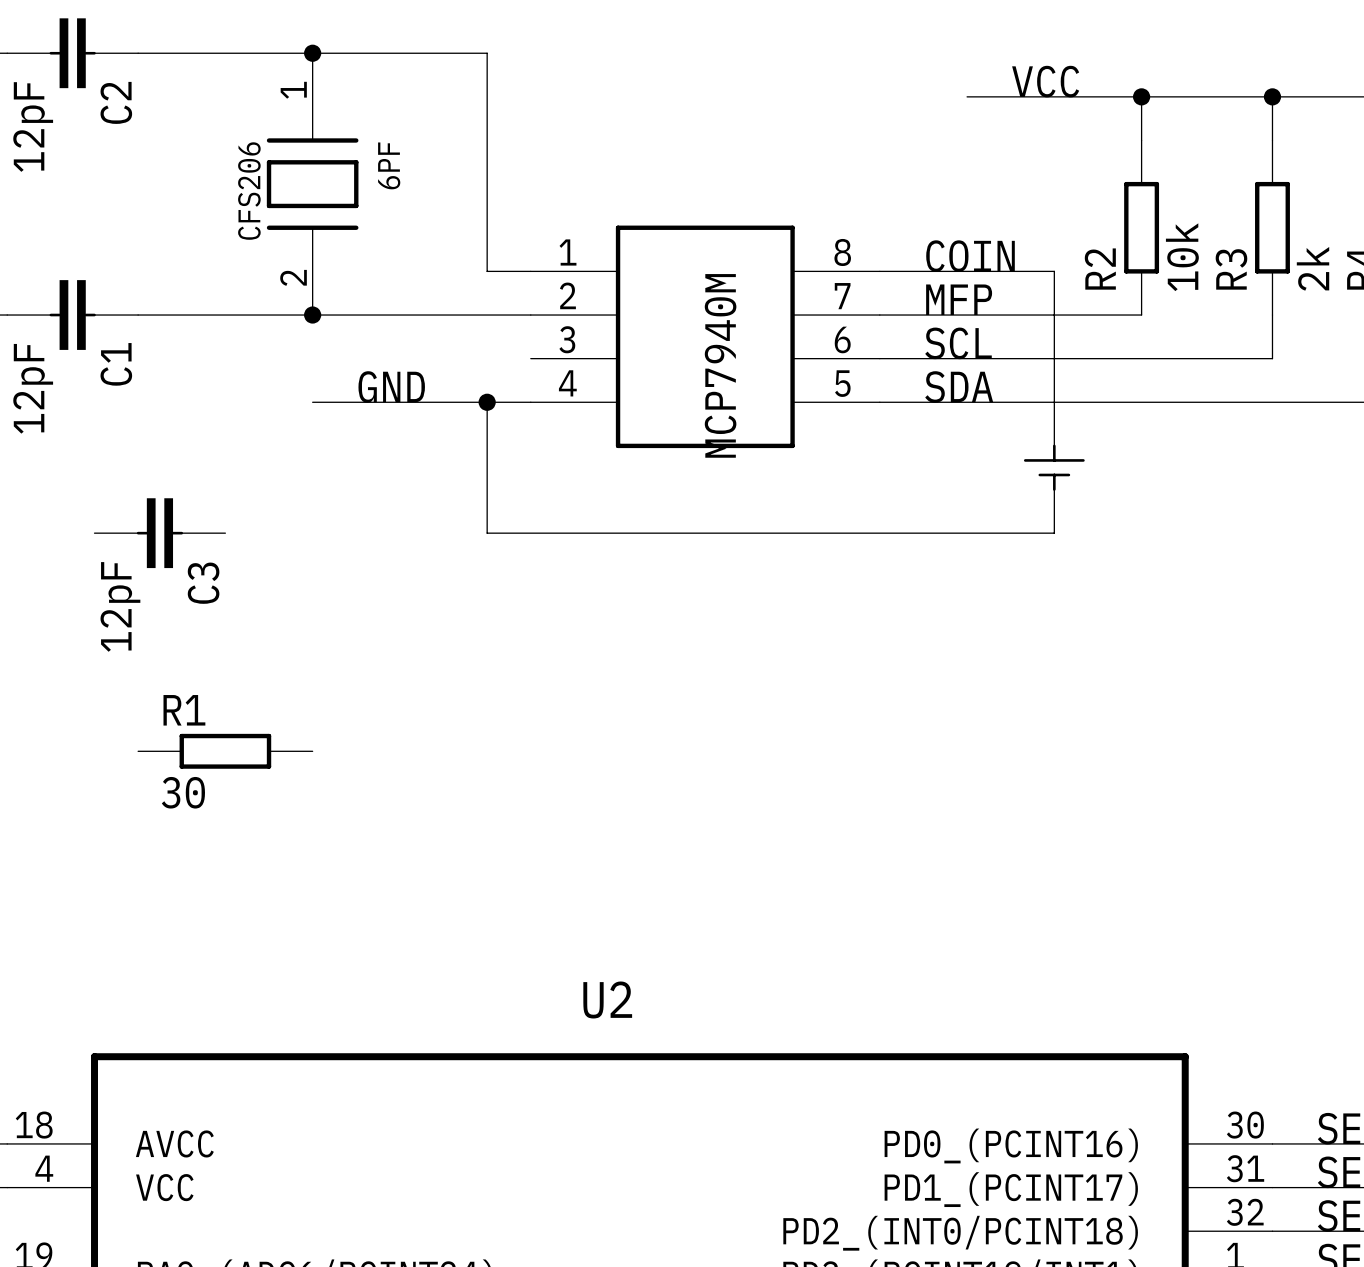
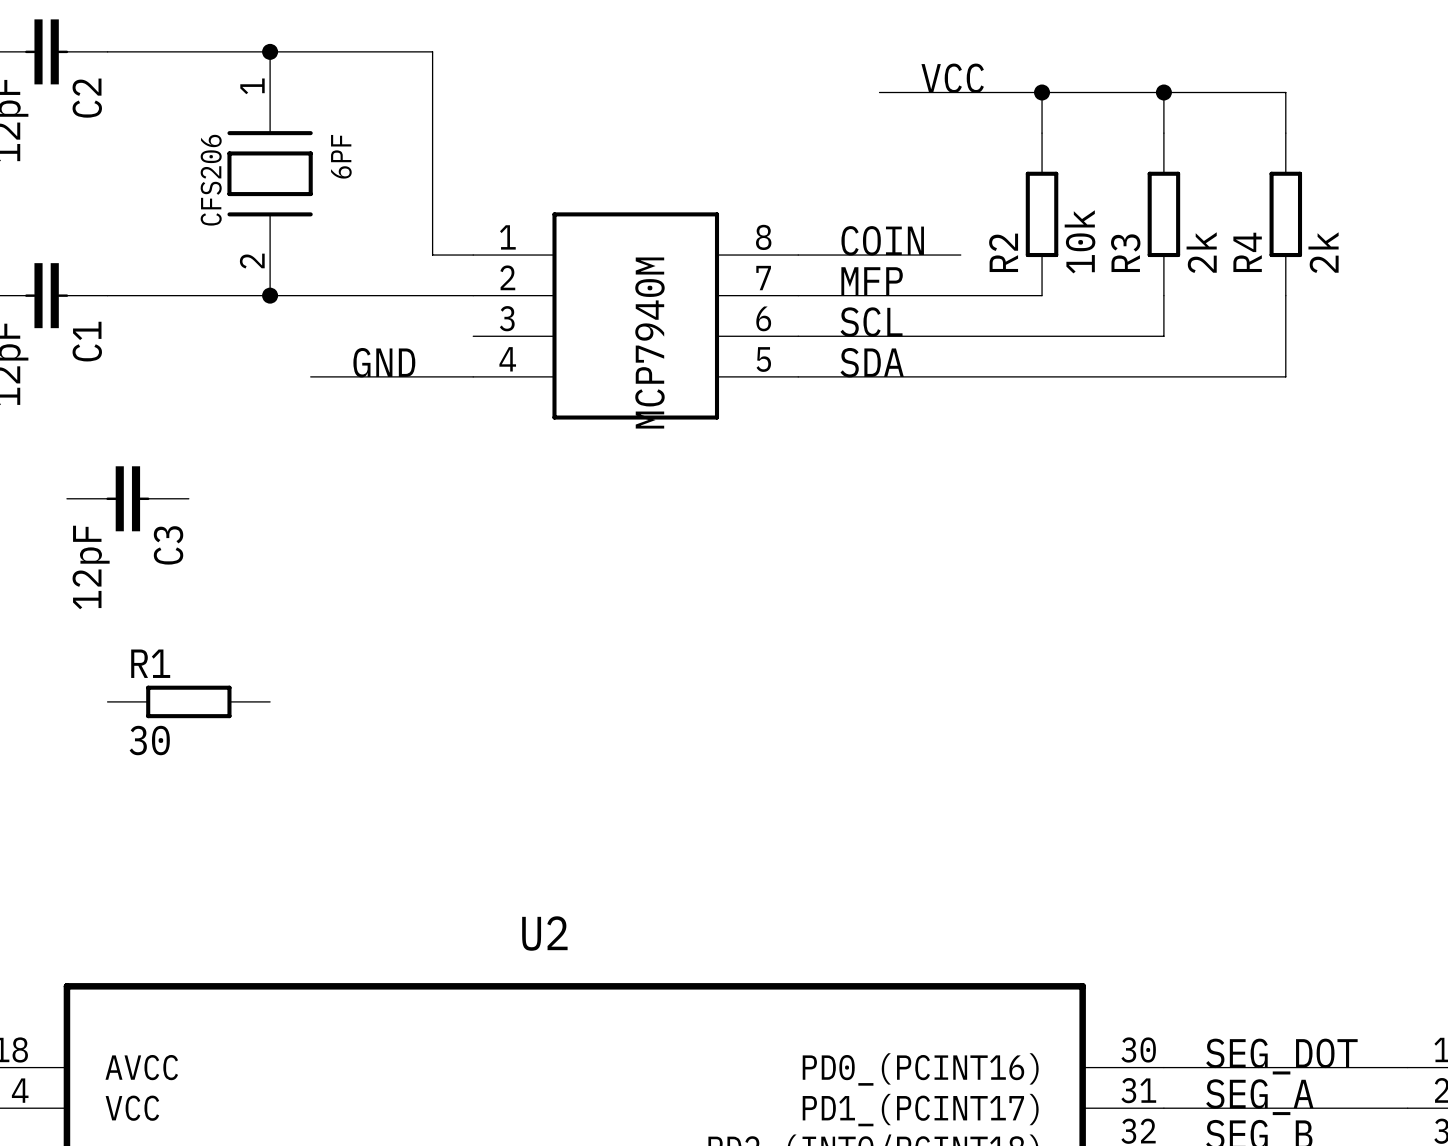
wire: (1054, 271) (1054, 445) -> none
label position: GND (391, 387) -> GND (384, 362)
wire: (312, 402) (356, 402) -> none
wire: (487, 402) (487, 533) (1054, 533) (1054, 489) -> none
junction: (487, 402) -> none
part: (1054, 467) -> none

